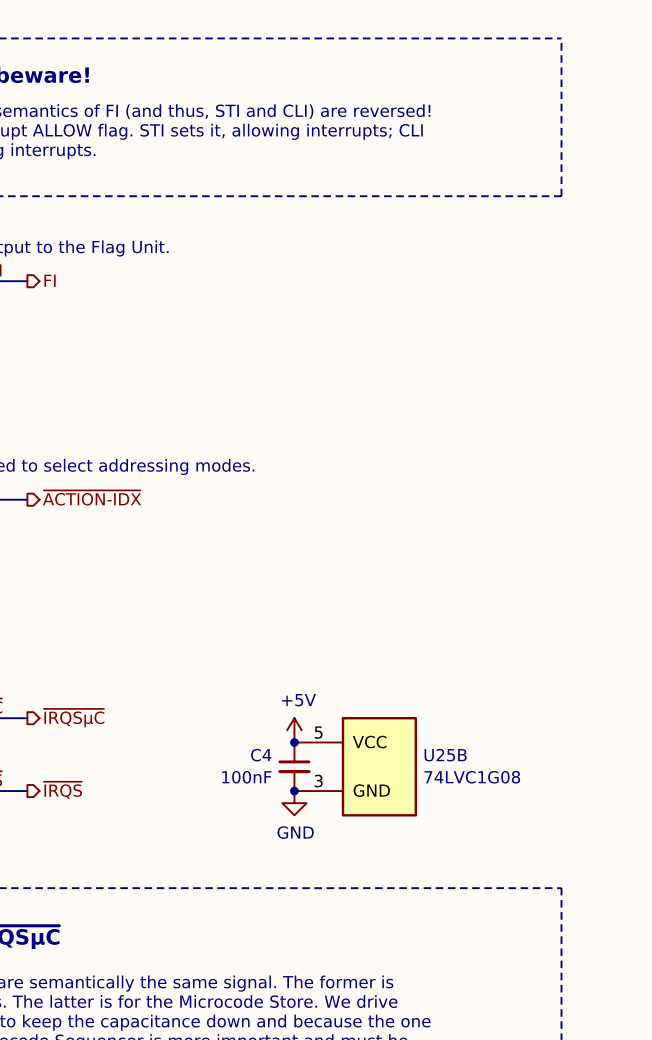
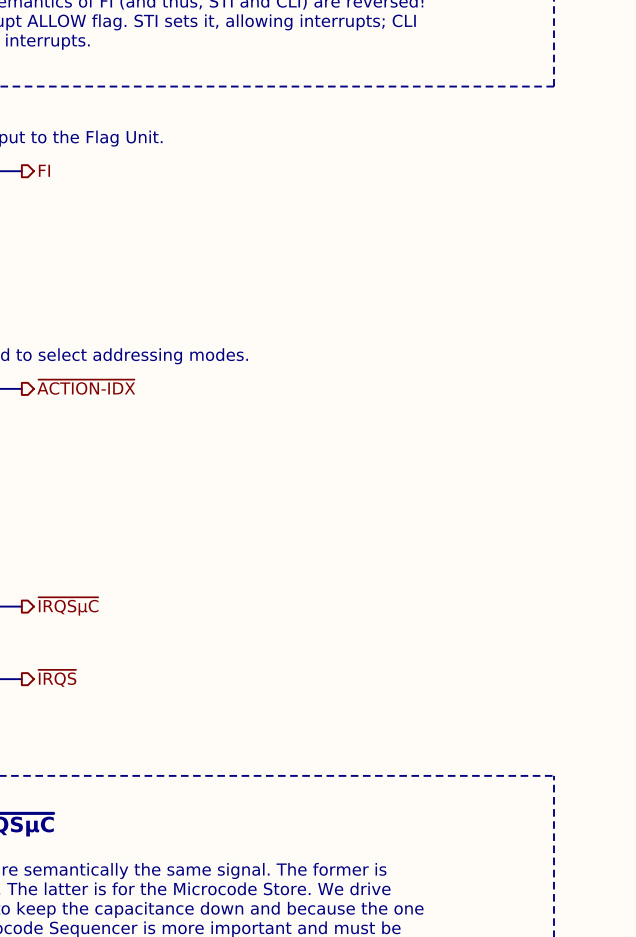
power symbol: +5V (294, 730) -> none
junction: (294, 742) -> none
C4: 100nF (294, 766) -> none
U25B: 74LVC1G08 (355, 766) -> none
junction: (294, 791) -> none
power symbol: GND (294, 803) -> none

